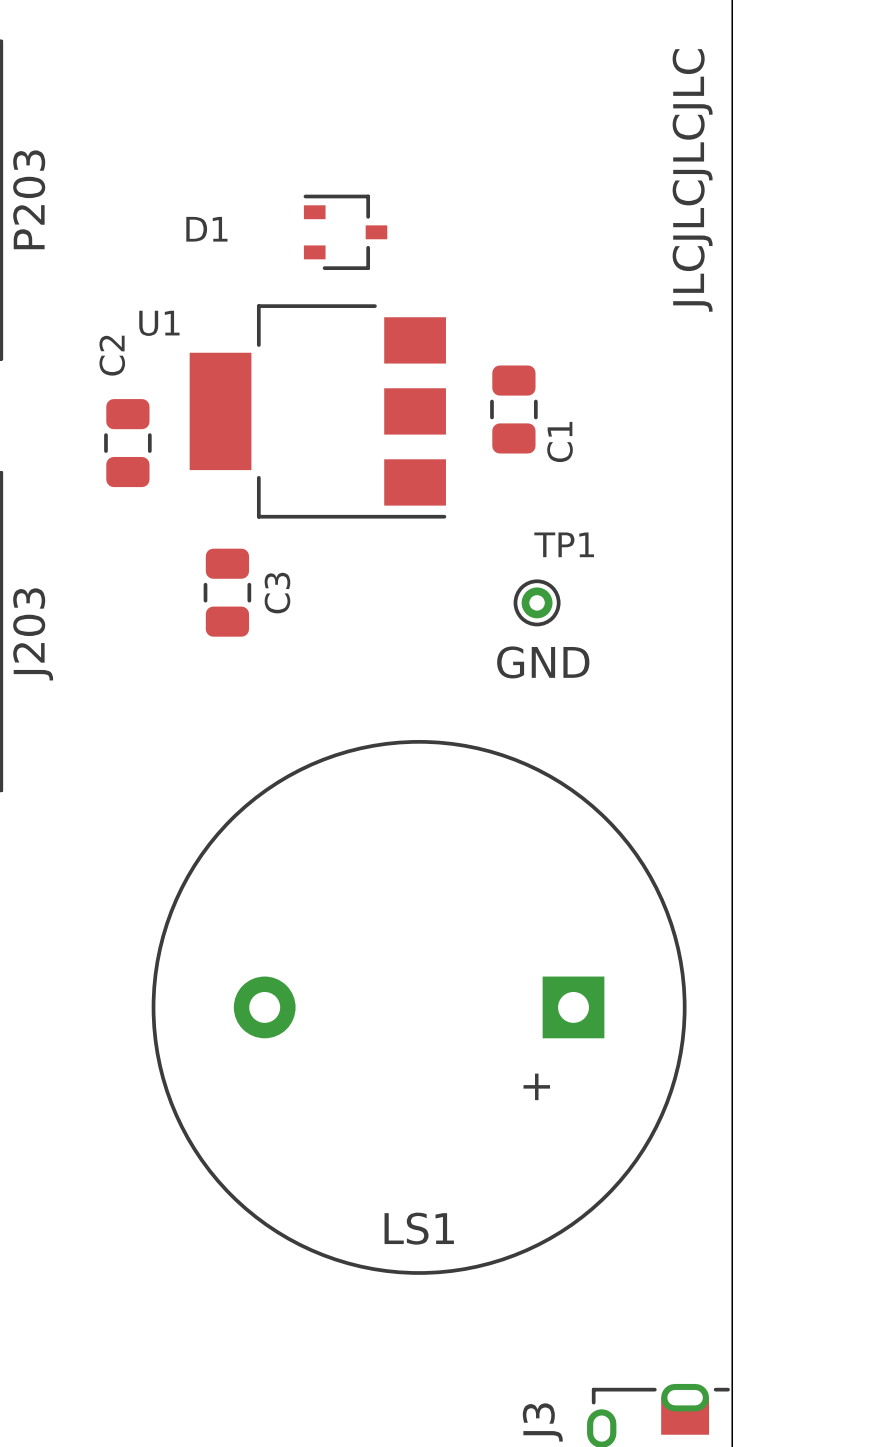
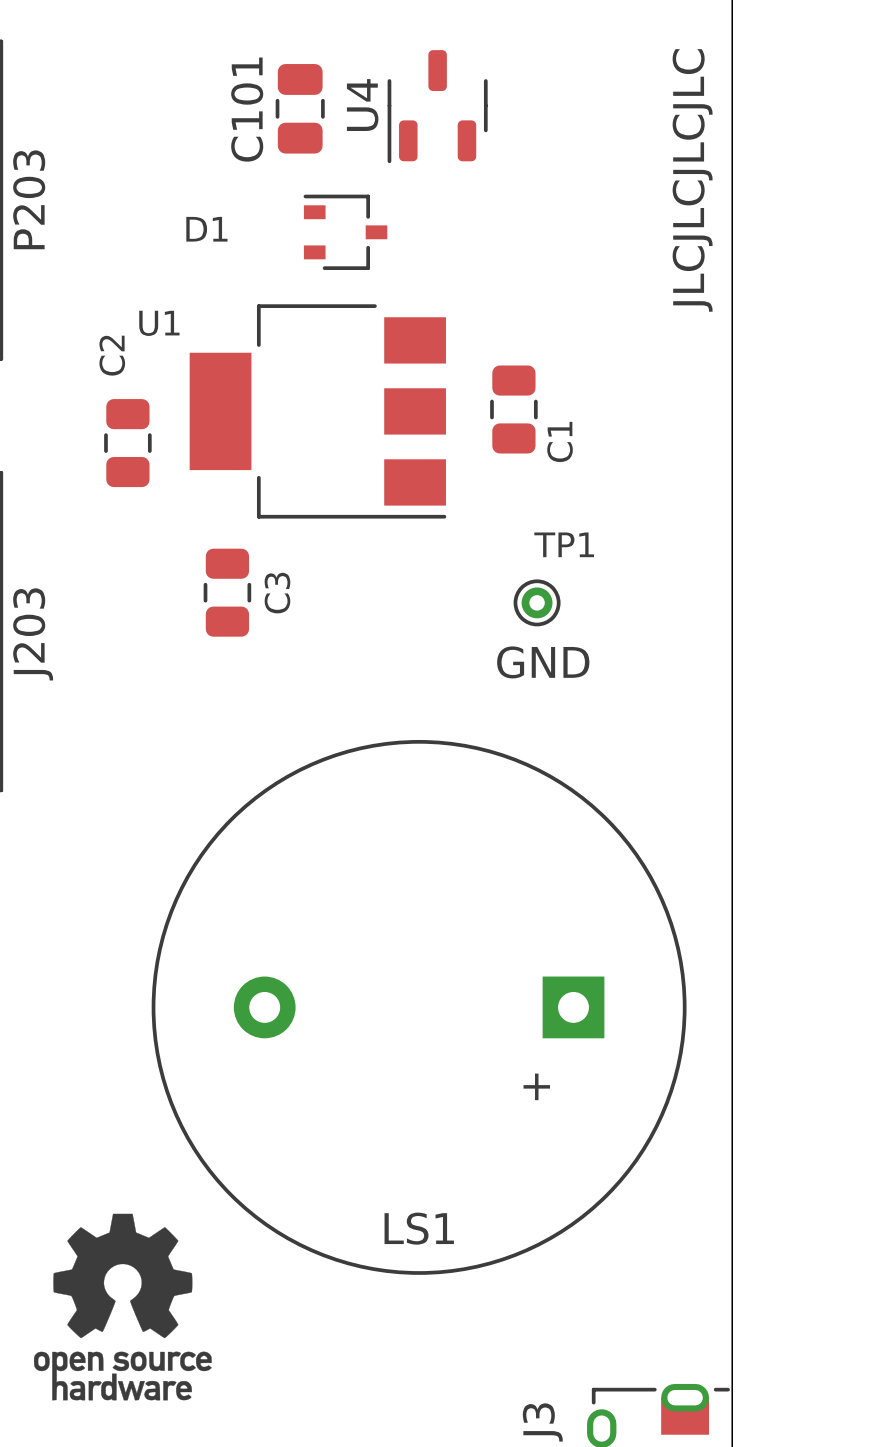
U4: none -> (437, 106)
C101: none -> (300, 108)
drawing: none -> [33, 1213, 212, 1401]

